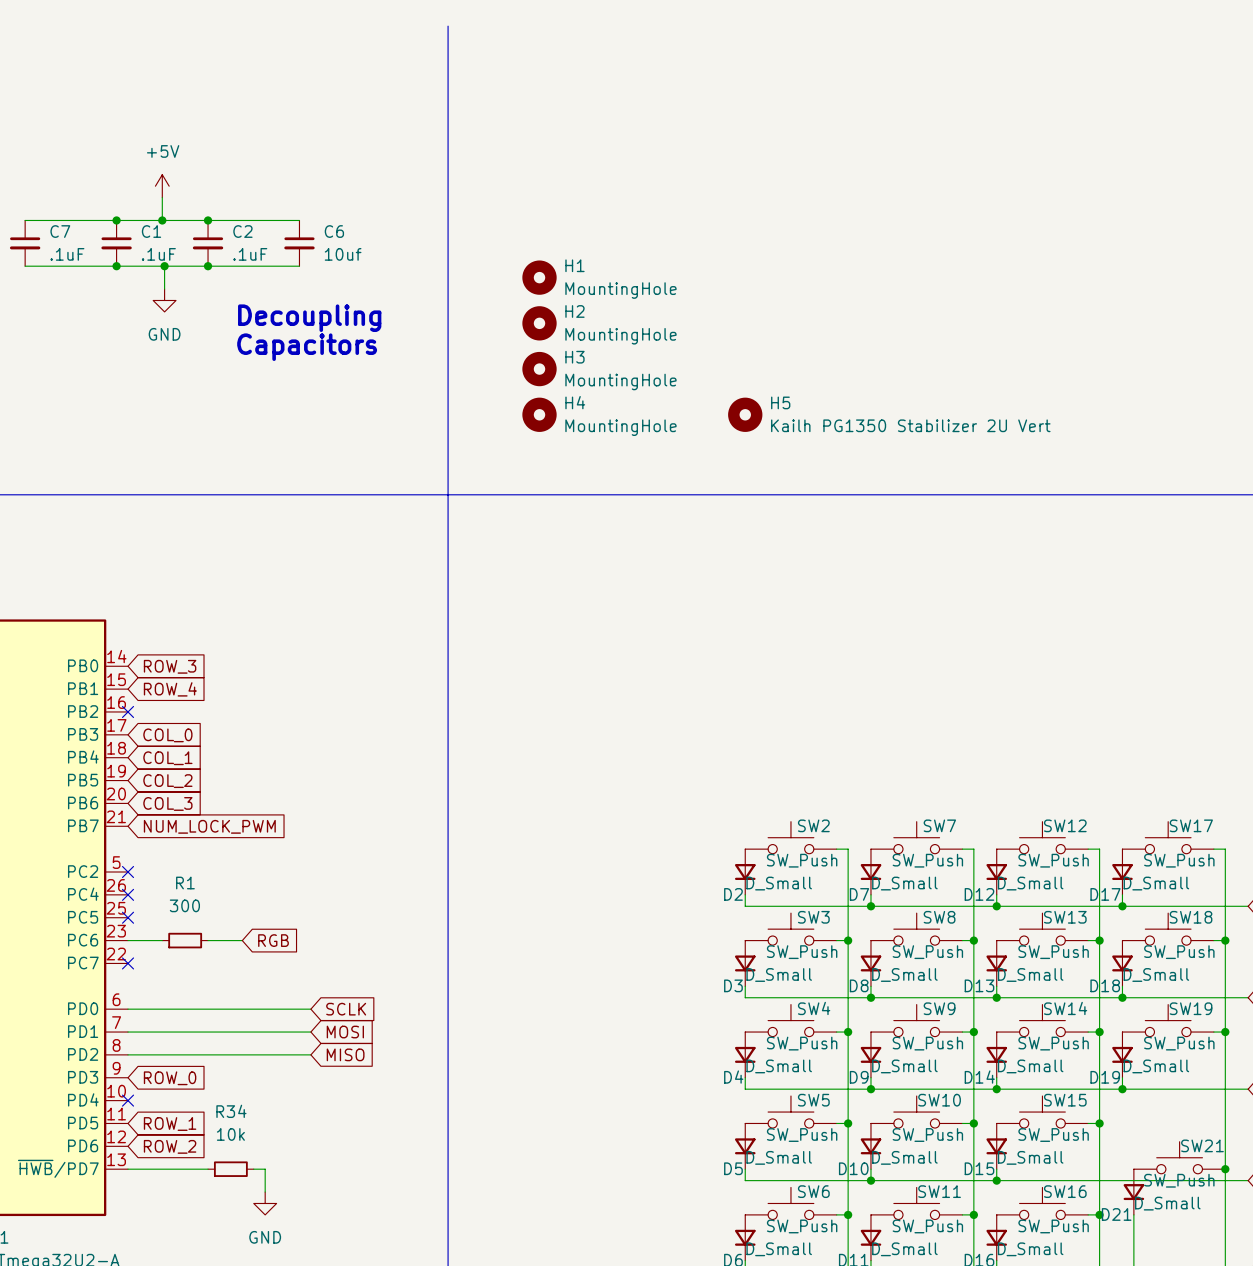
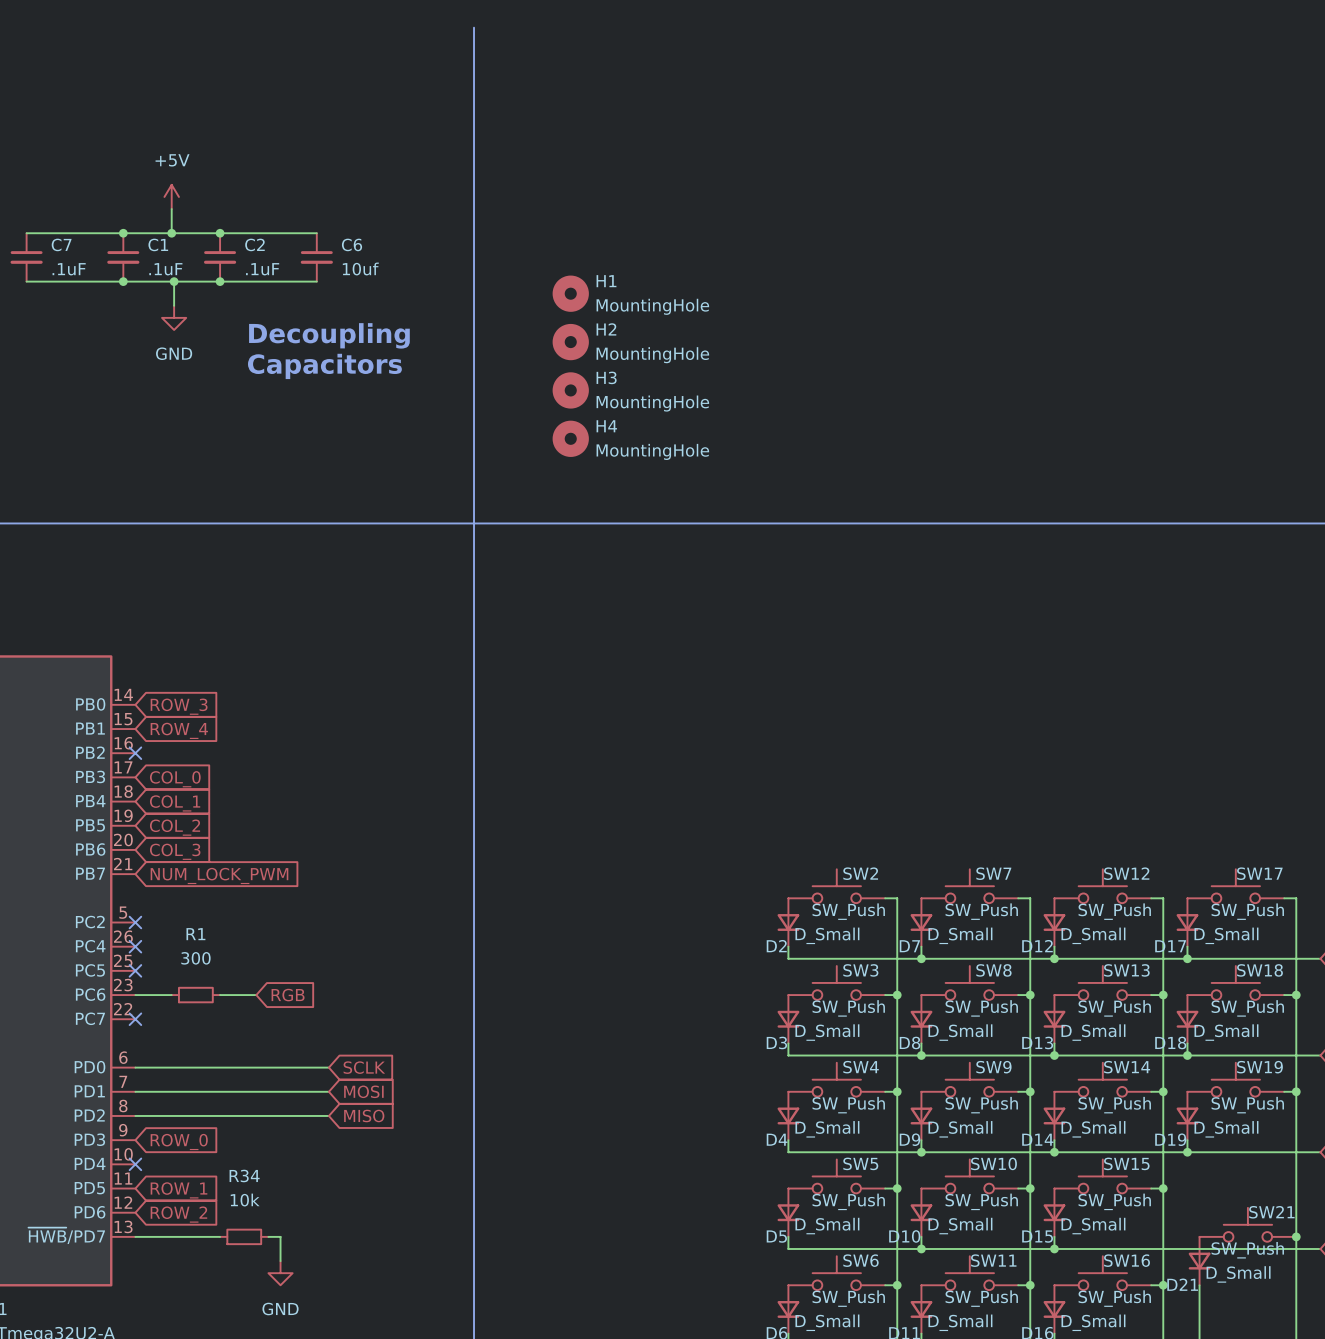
H5: Kailh PG1350 Stabilizer 2U Vert (745, 414) -> none

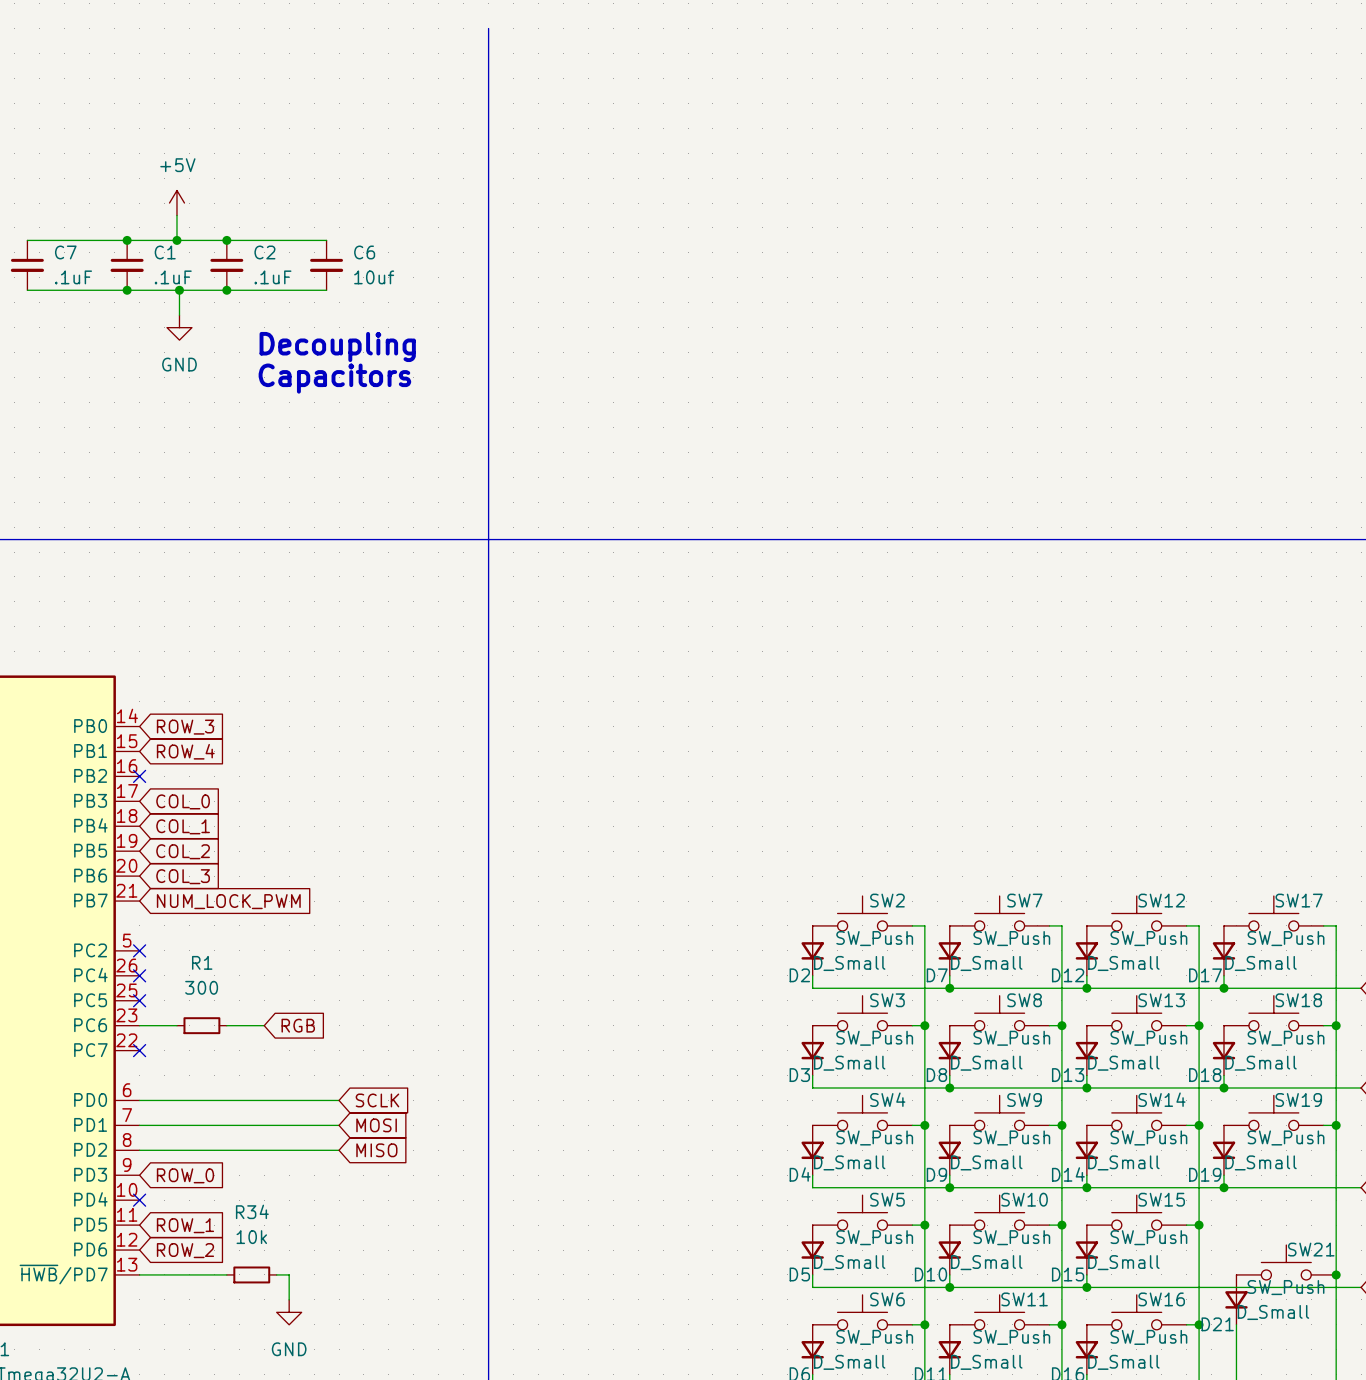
H1: MountingHole (570, 293) -> none
H2: MountingHole (570, 342) -> none
H3: MountingHole (570, 390) -> none
H4: MountingHole (570, 438) -> none

